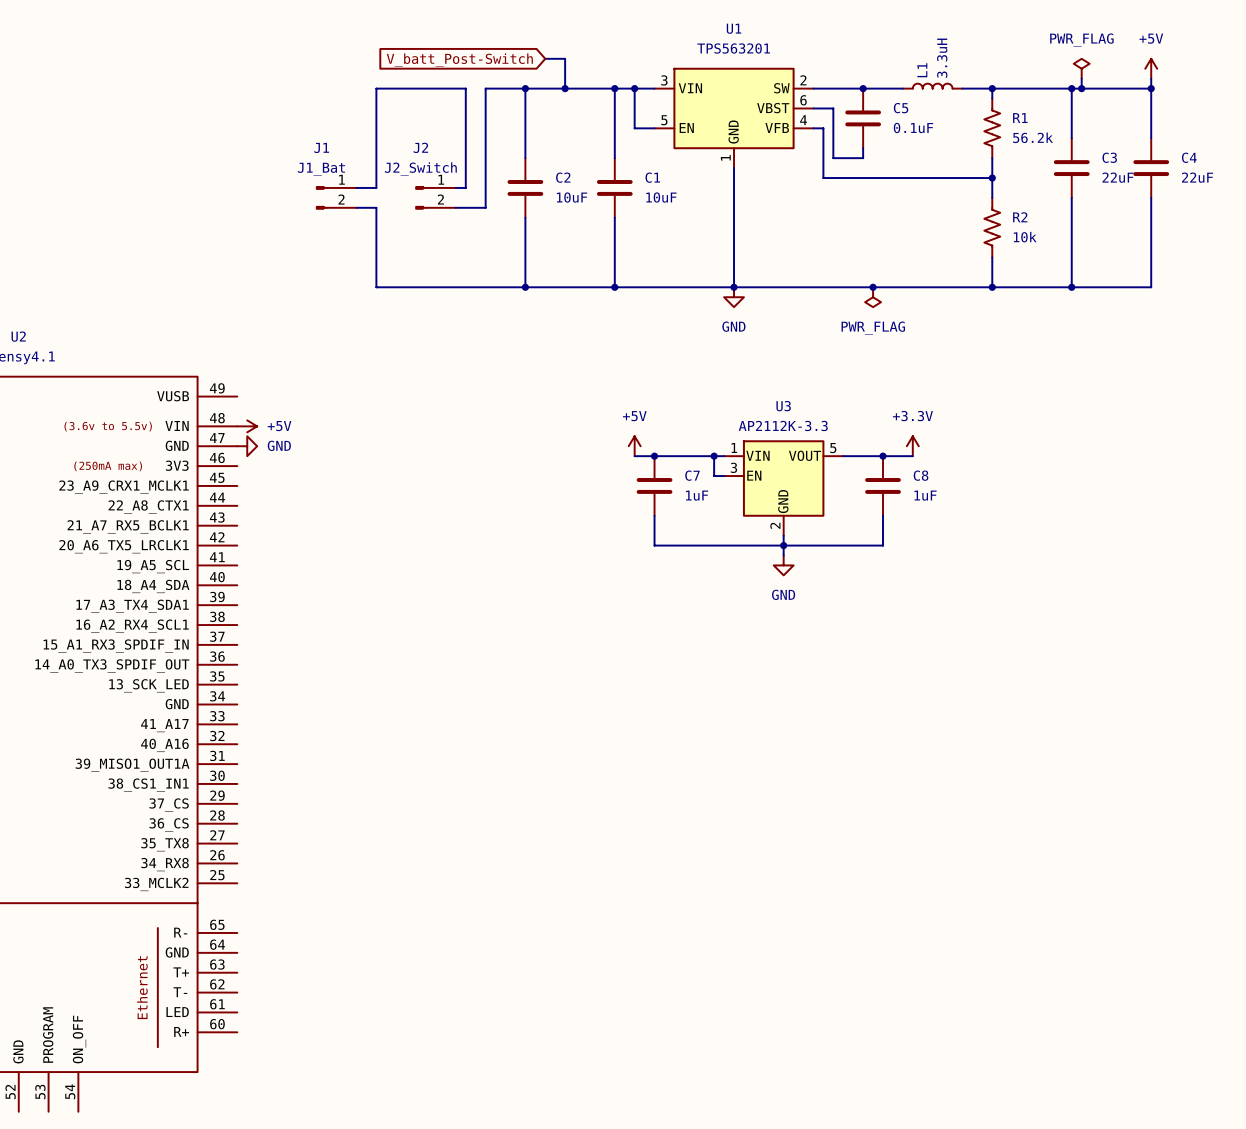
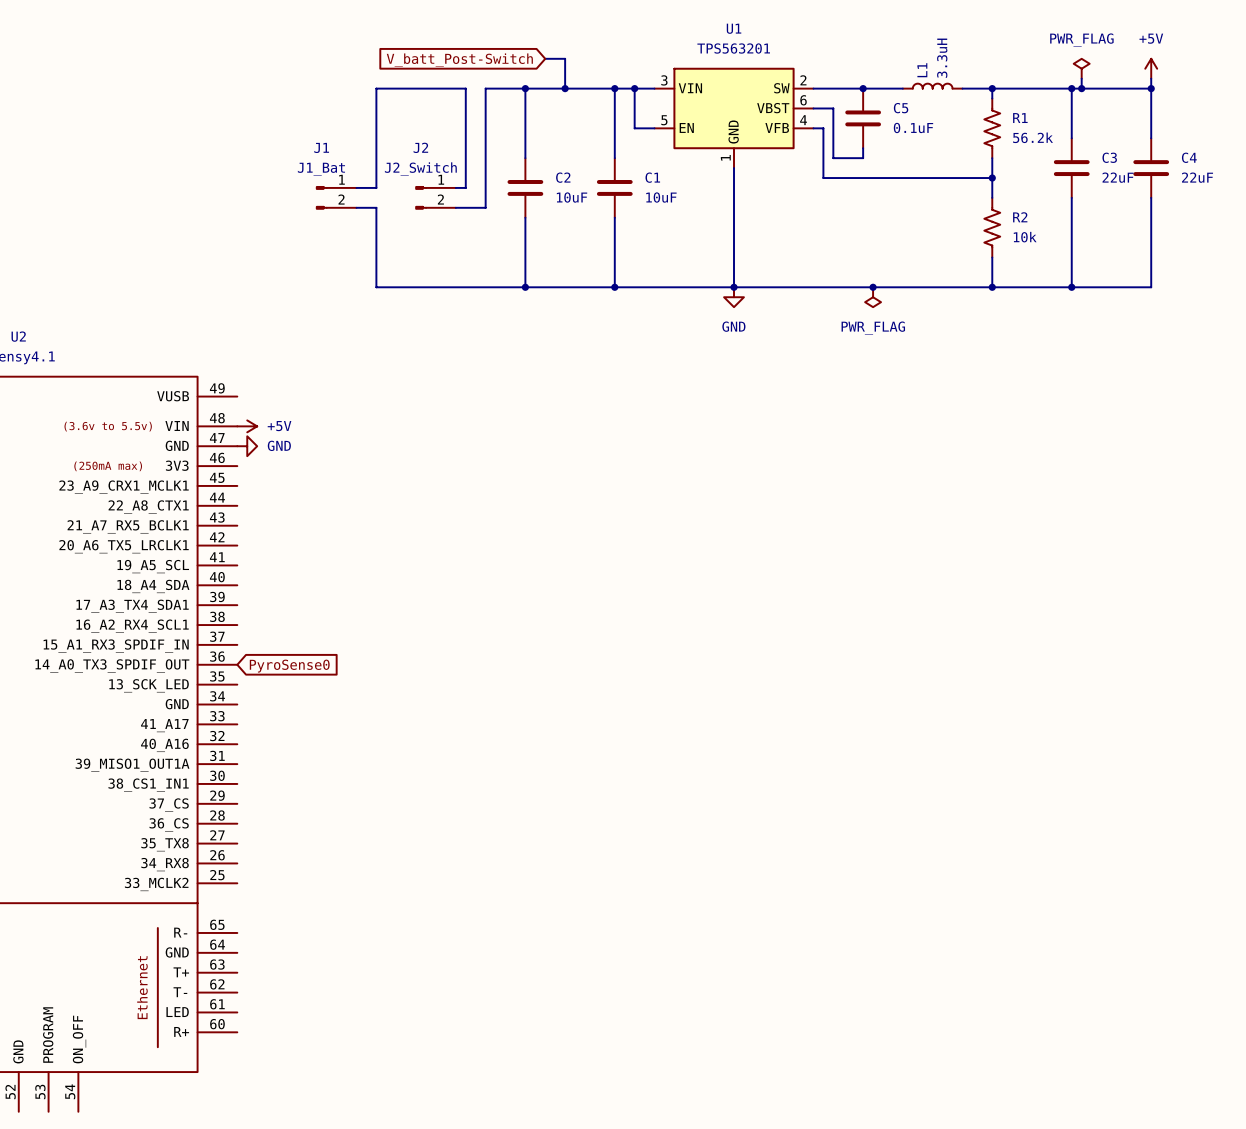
power symbol: +5V (634, 446) -> none
power symbol: +3.3V (912, 446) -> none
wire: (634, 456) (724, 456) -> none
junction: (654, 456) -> none
wire: (714, 456) (714, 476) (724, 476) -> none
junction: (714, 456) -> none
wire: (843, 456) (912, 456) -> none
junction: (883, 456) -> none
C7: 1uF (654, 485) -> none
C8: 1uF (883, 485) -> none
U3: AP2112K-3.3 (783, 487) -> none
wire: (654, 515) (654, 545) (883, 545) (883, 515) -> none
wire: (783, 535) (783, 555) -> none
junction: (783, 545) -> none
power symbol: GND (783, 565) -> none
global label: none -> PyroSense0 (289, 666)

